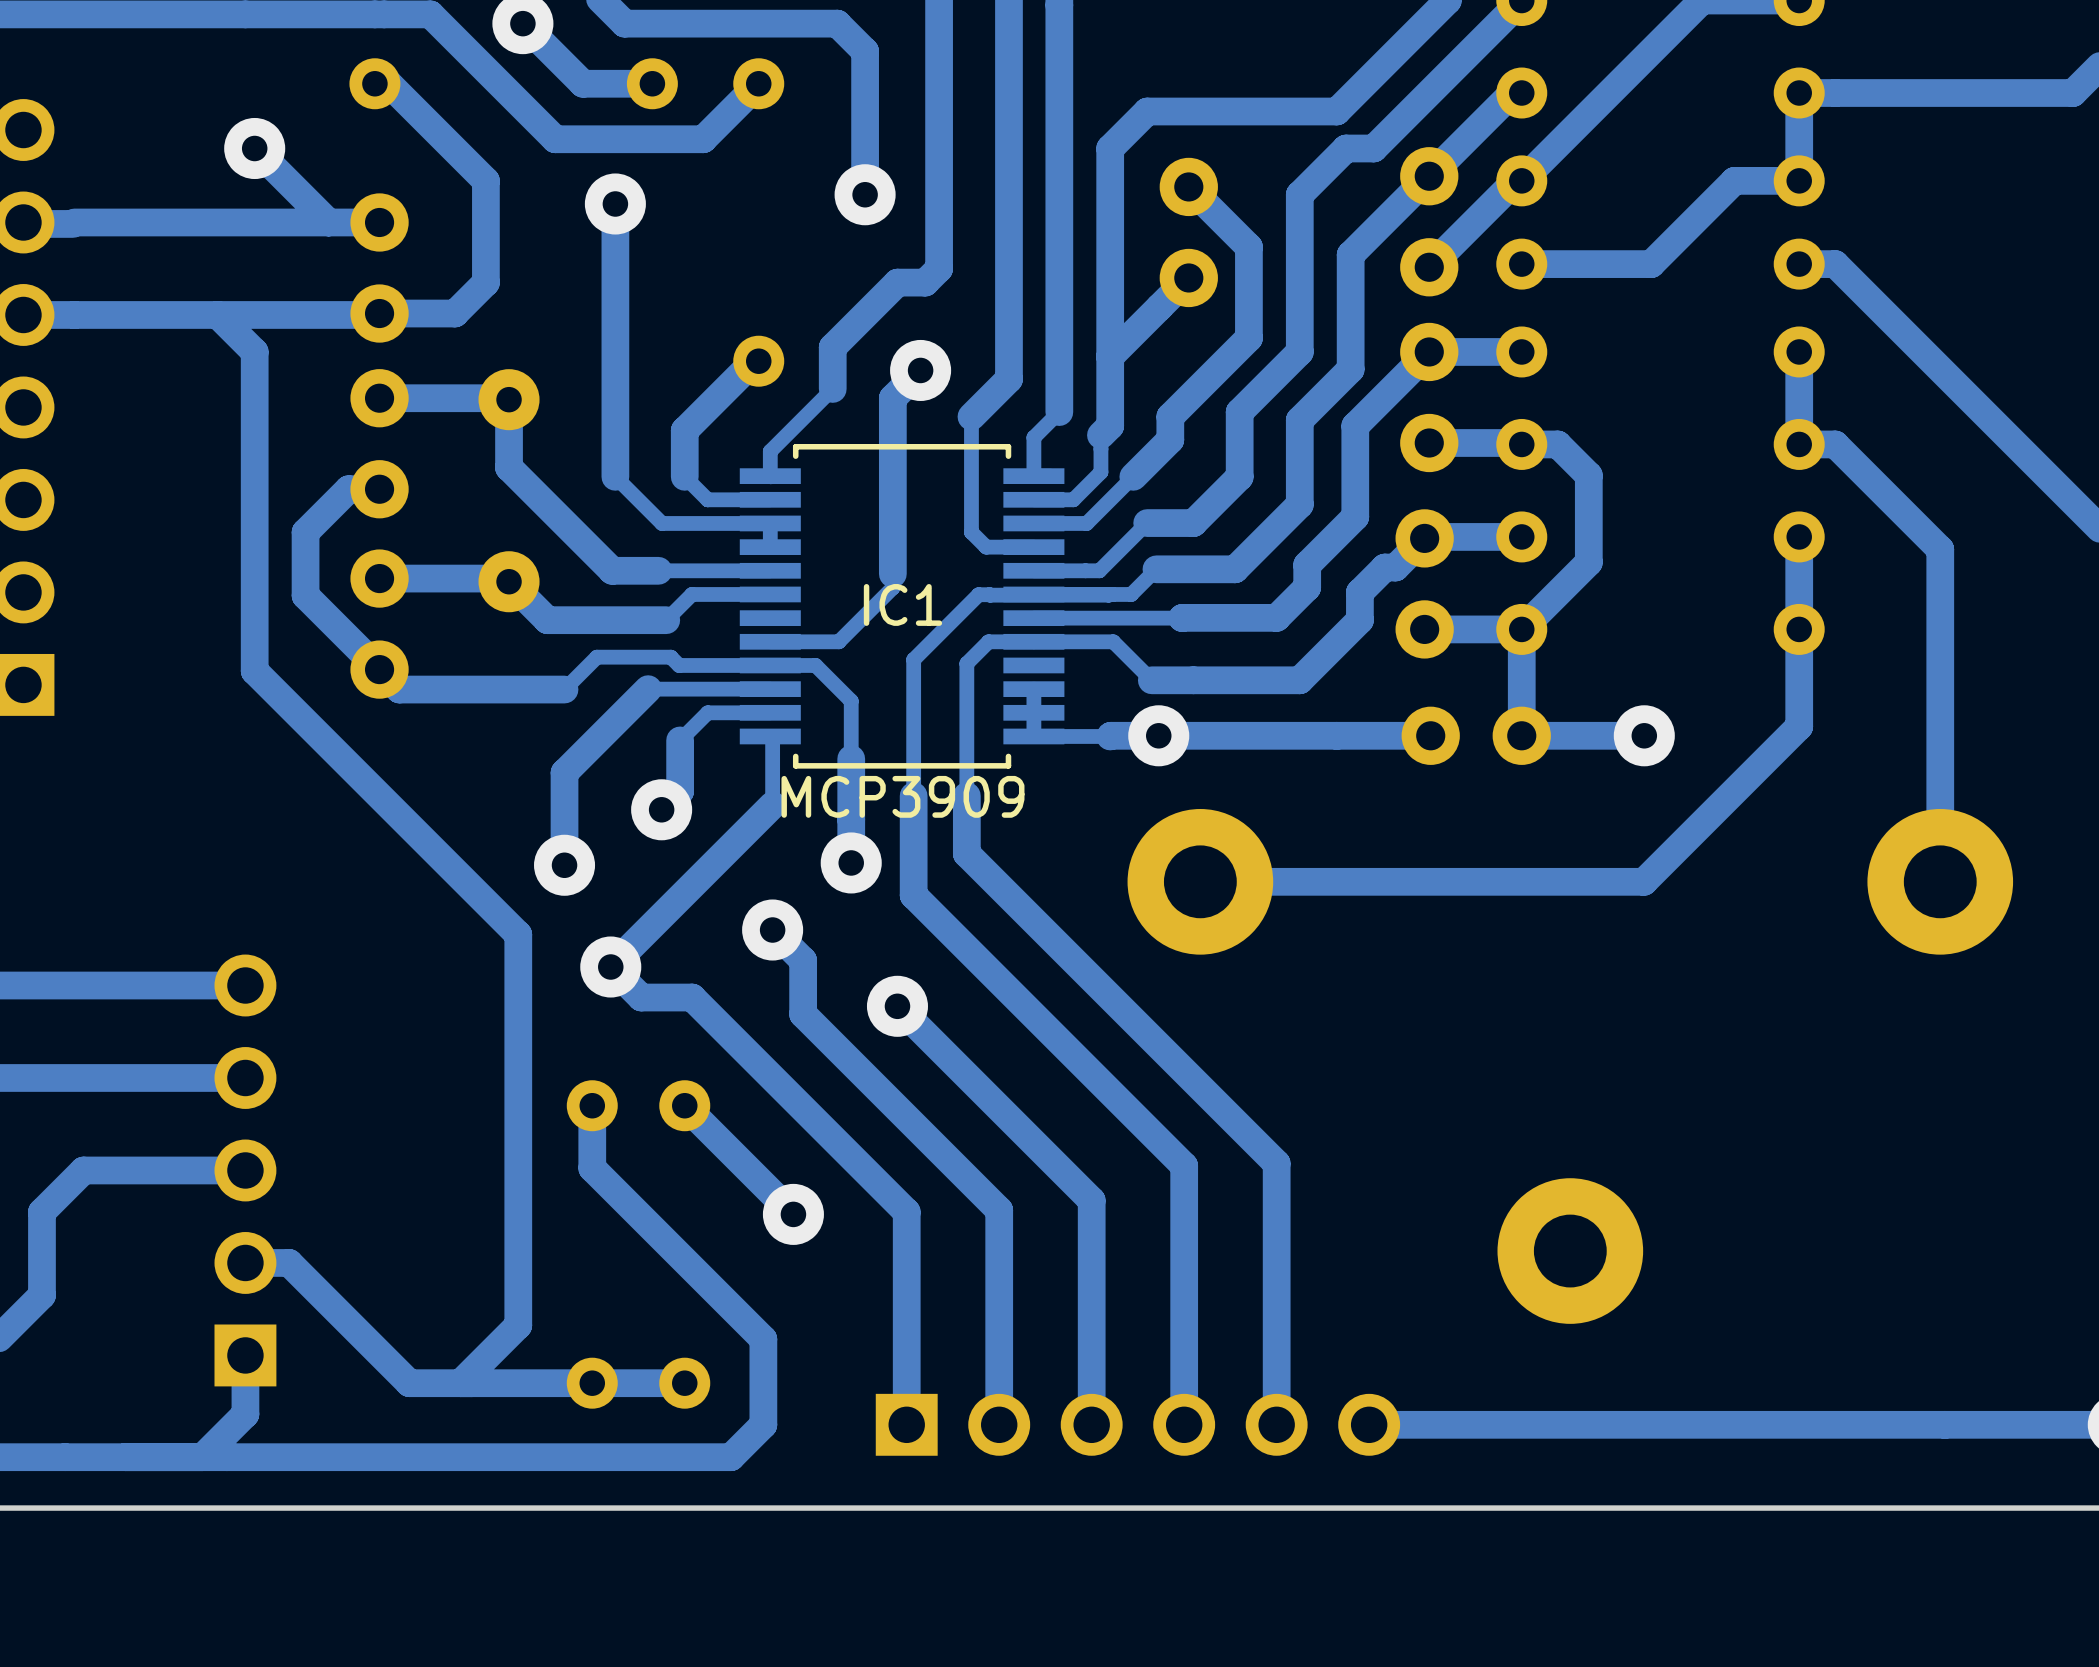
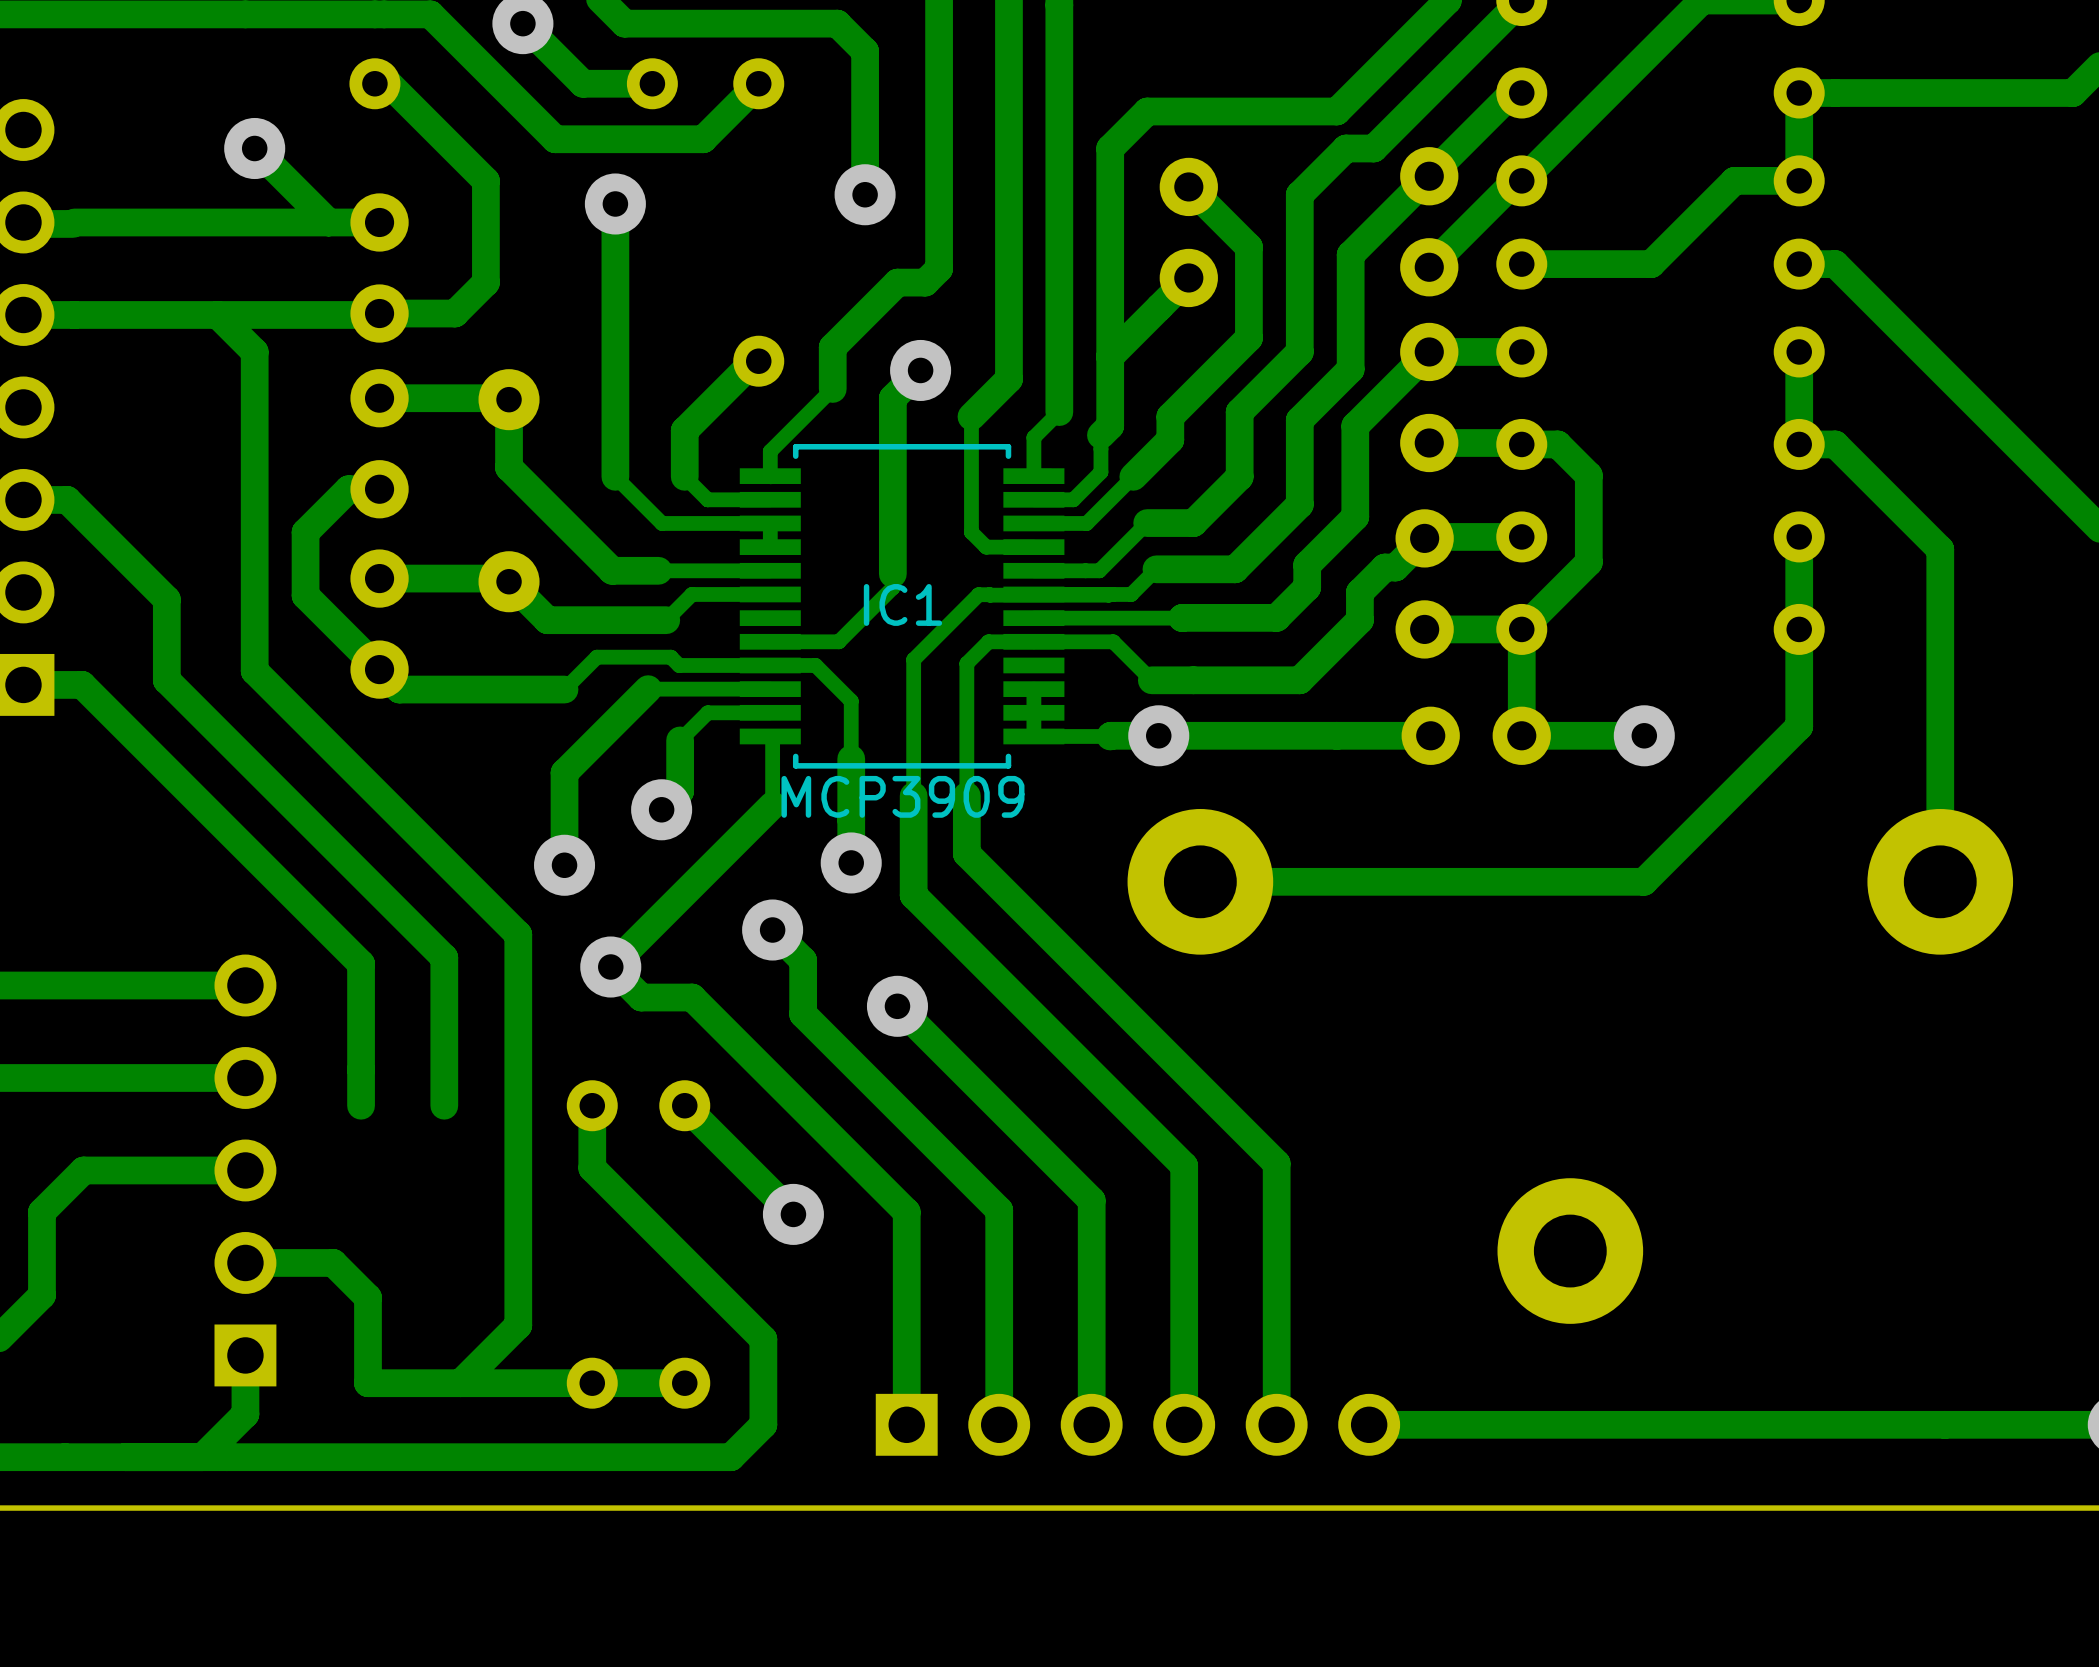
track: none -> (23, 499) (67, 499) (166, 599) (166, 680) (444, 957) (444, 1105)
track: none -> (23, 684) (82, 684) (361, 963) (361, 1105)
track: (289, 1262) (409, 1383) -> (289, 1262) (333, 1262) (367, 1297) (367, 1383) (409, 1383)

